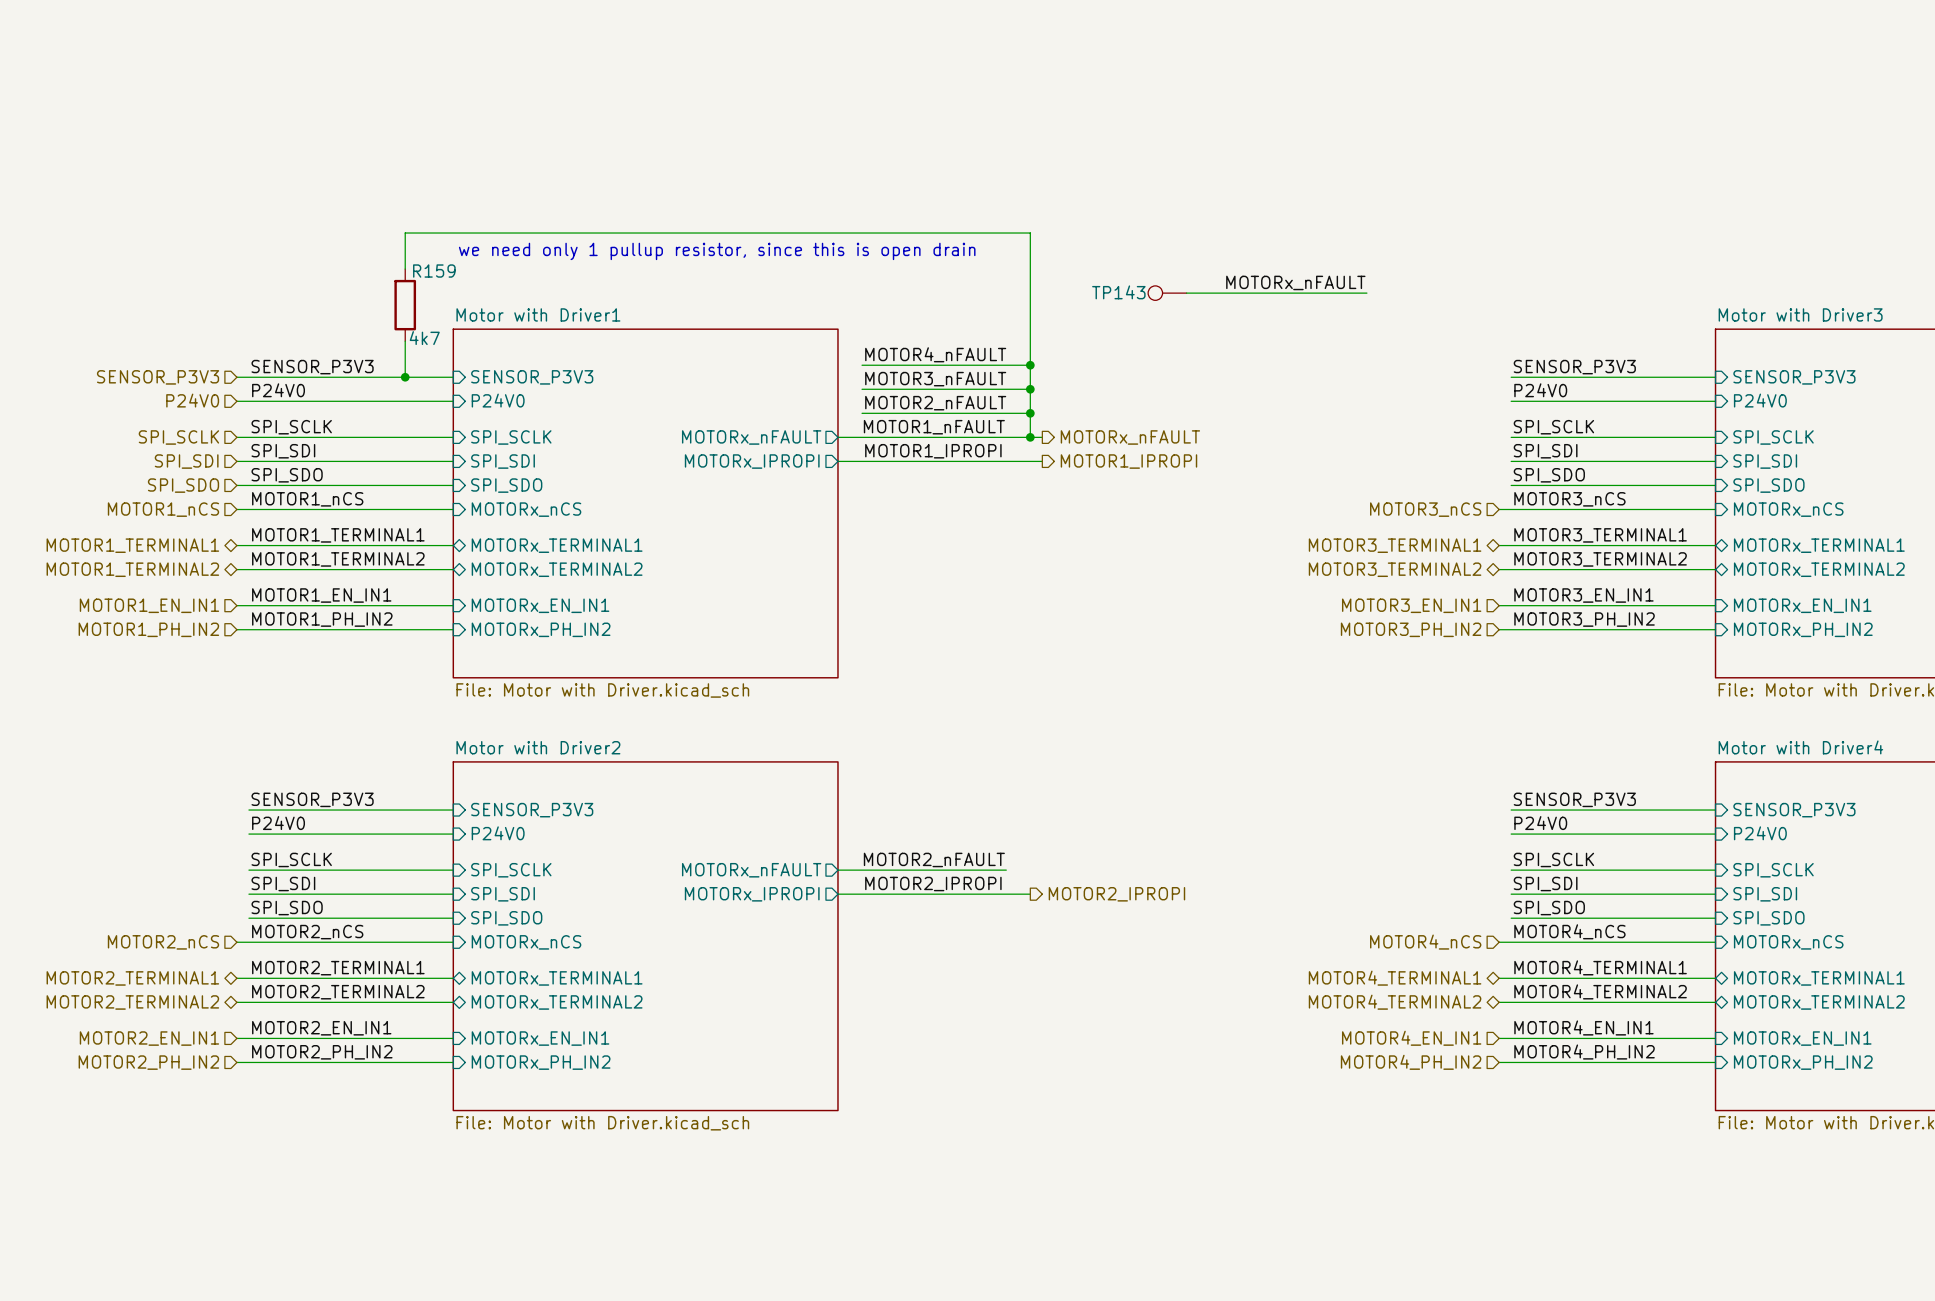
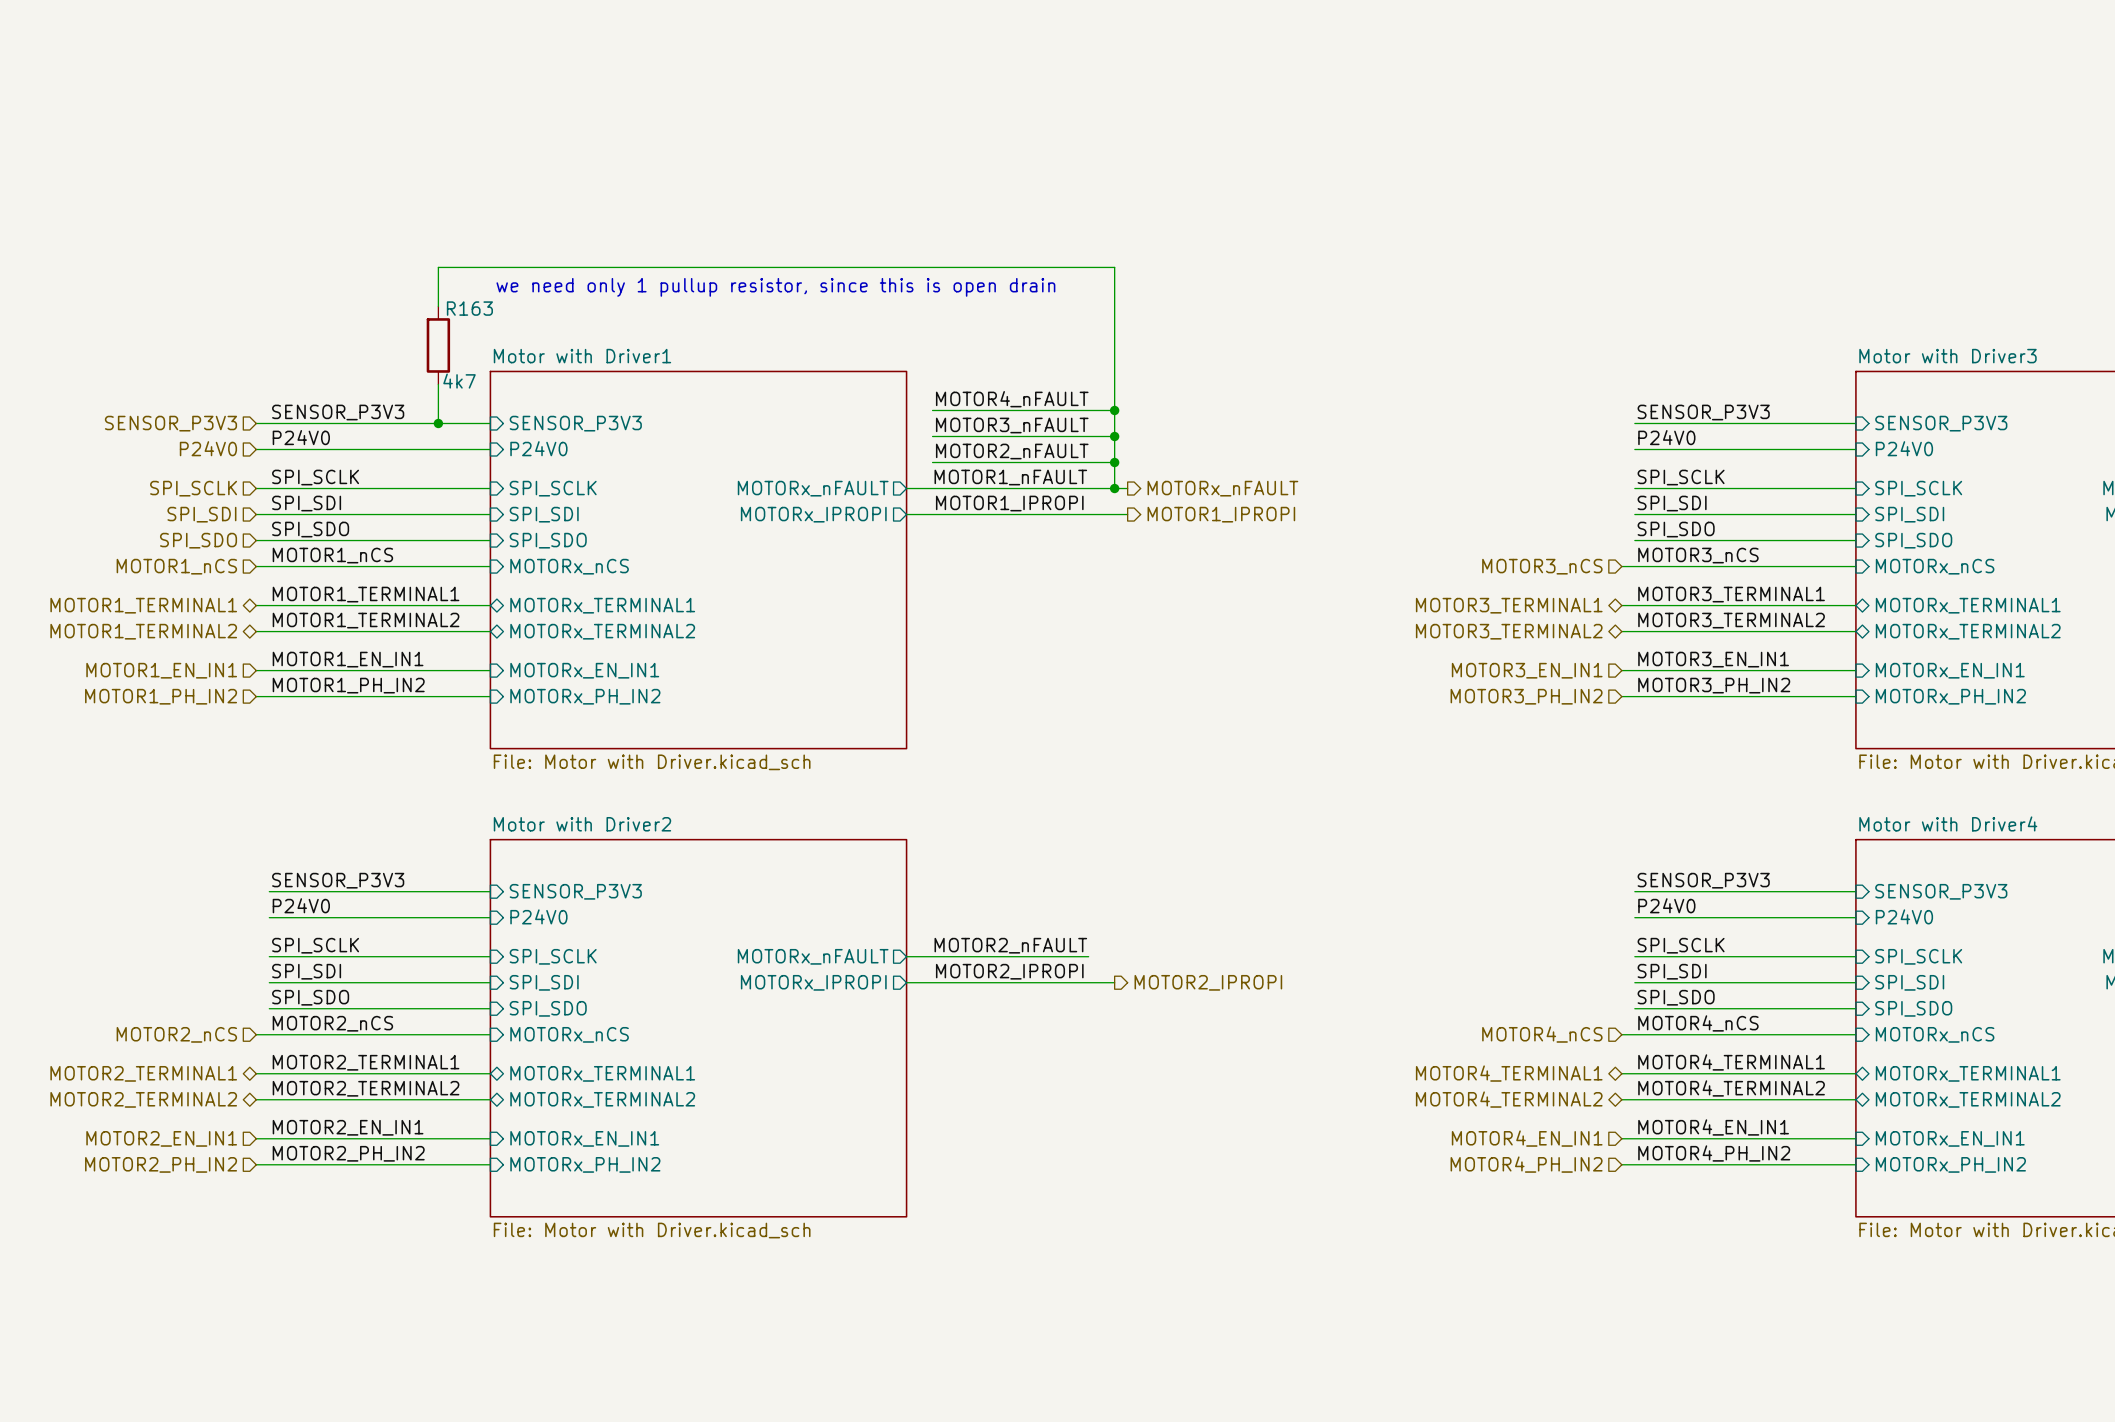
R159 name: R159 (434, 271) -> R163 (469, 308)
label: MOTORx_nFAULT (1295, 282) -> none
TP143: (1167, 293) -> none
wire: (1186, 293) (1366, 293) -> none

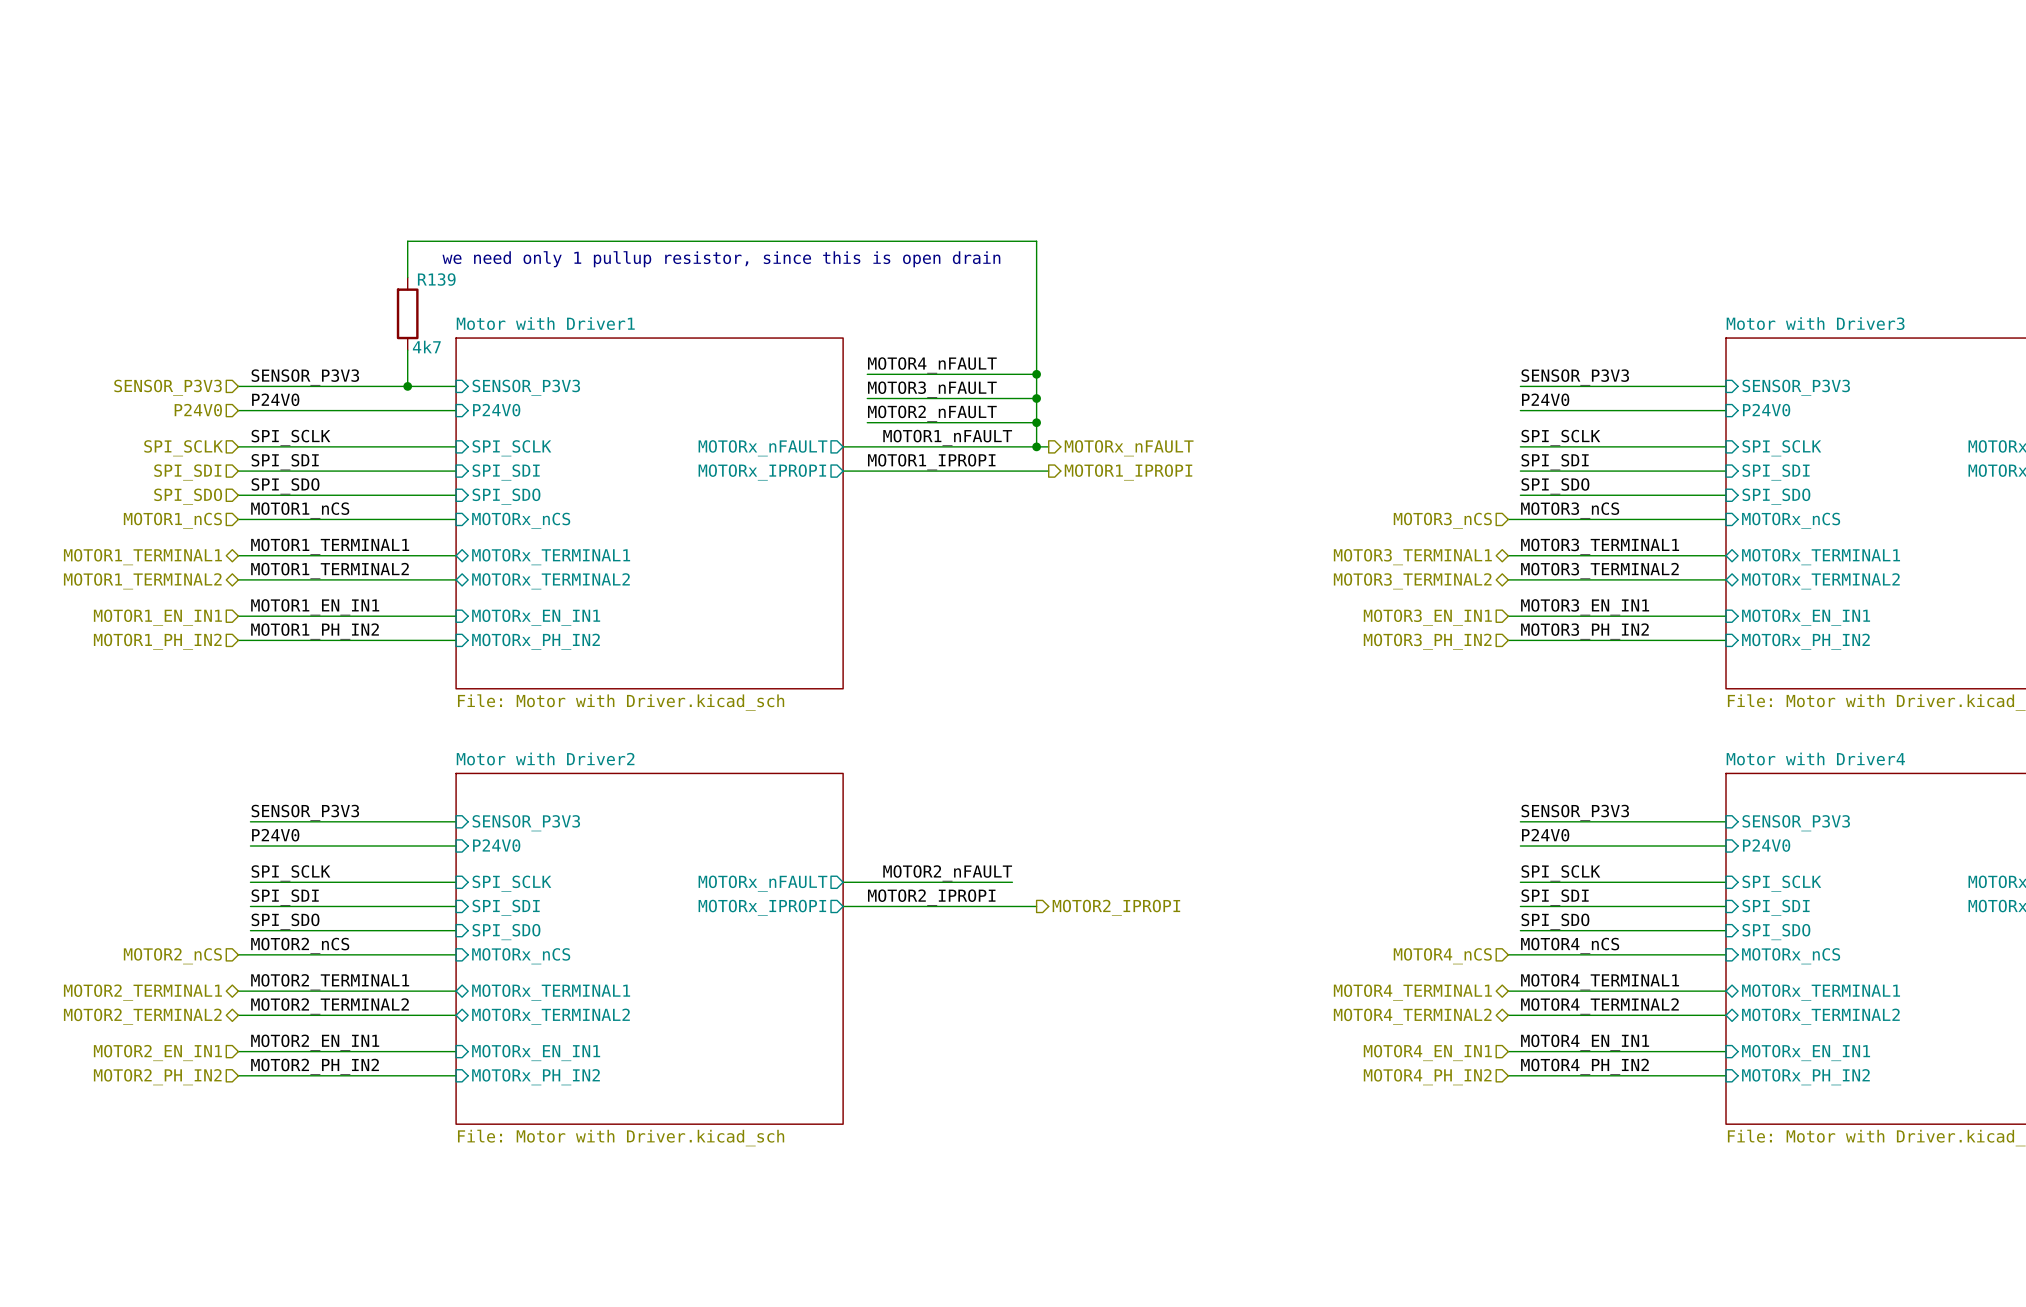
R163 name: R163 (469, 308) -> R139 (436, 279)

